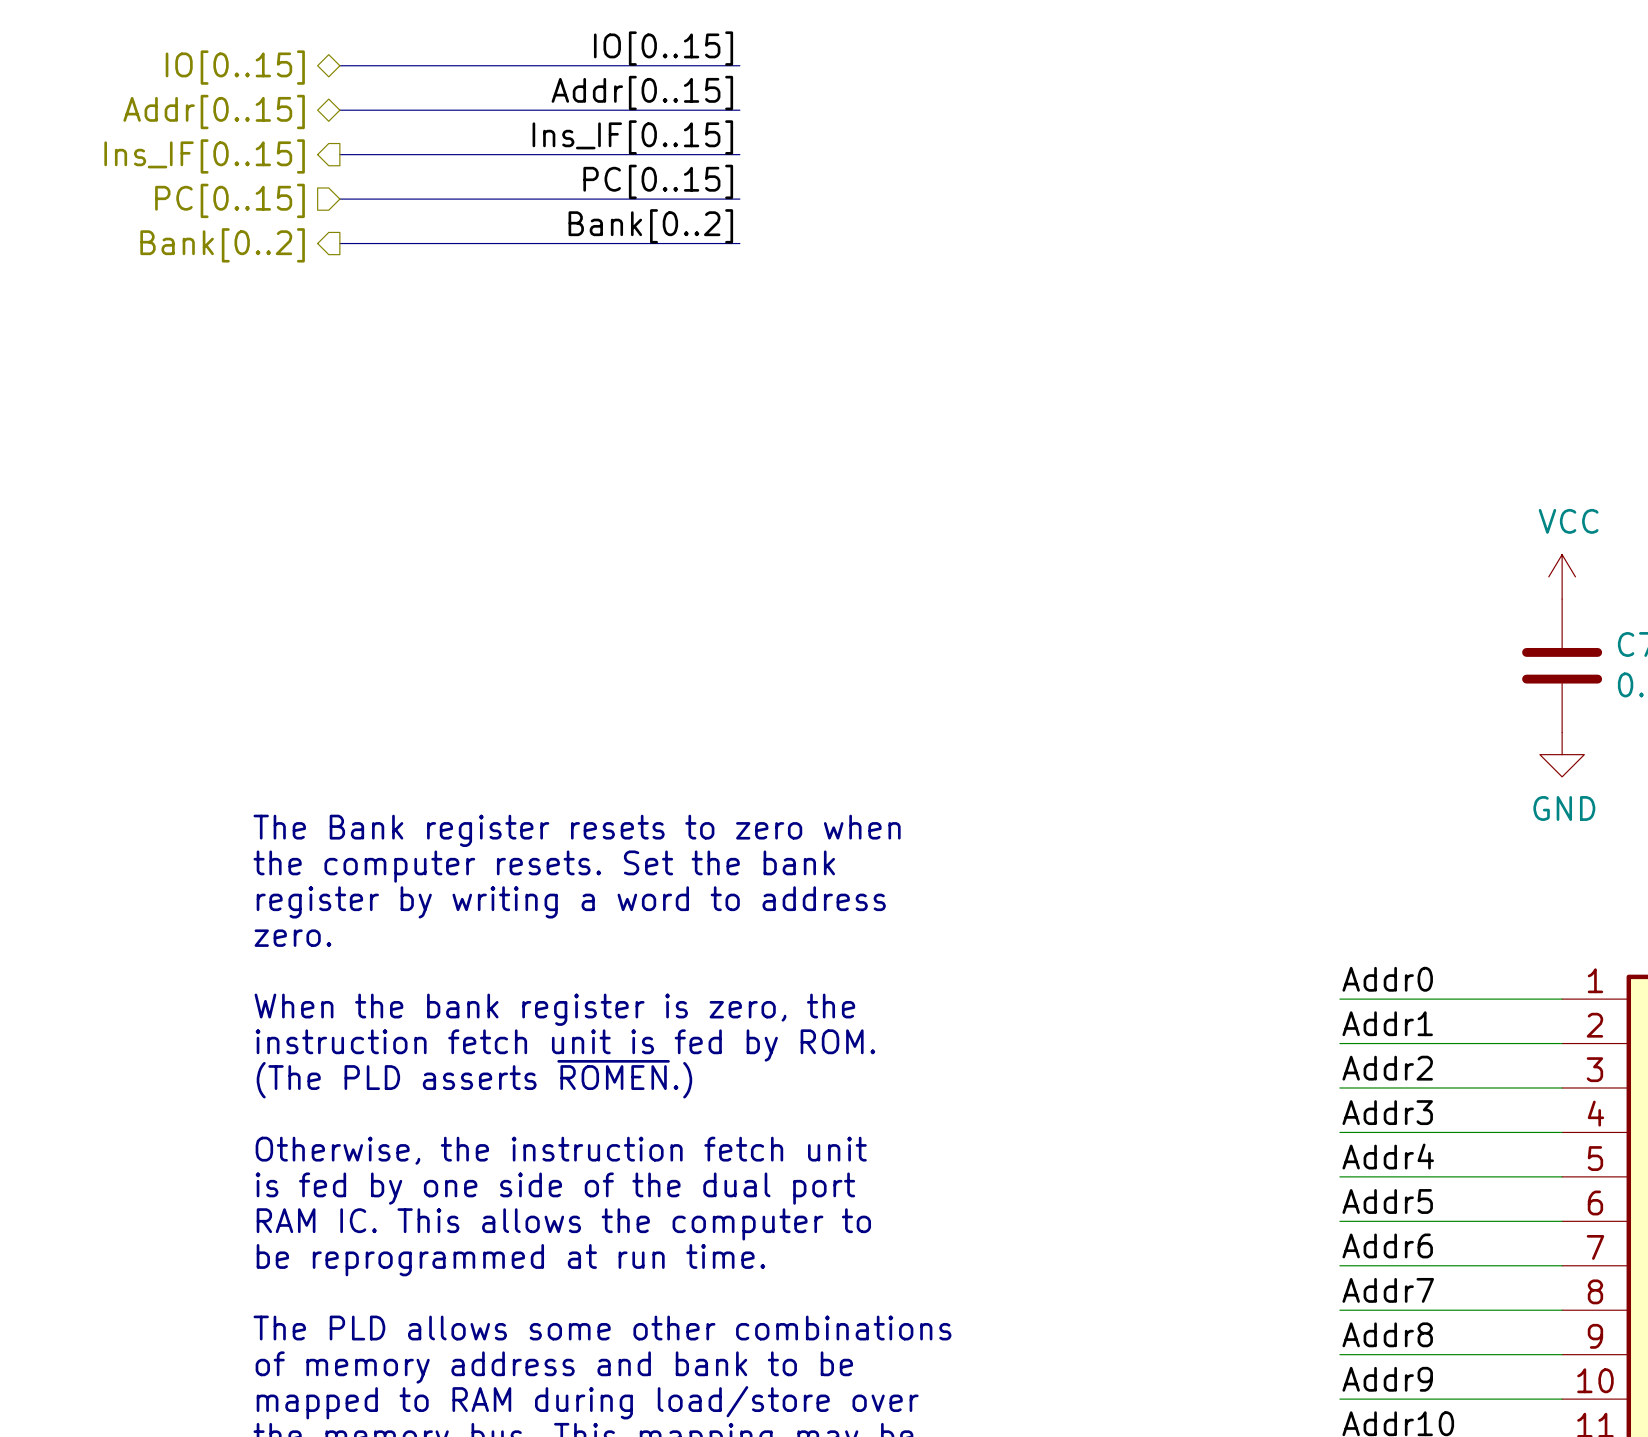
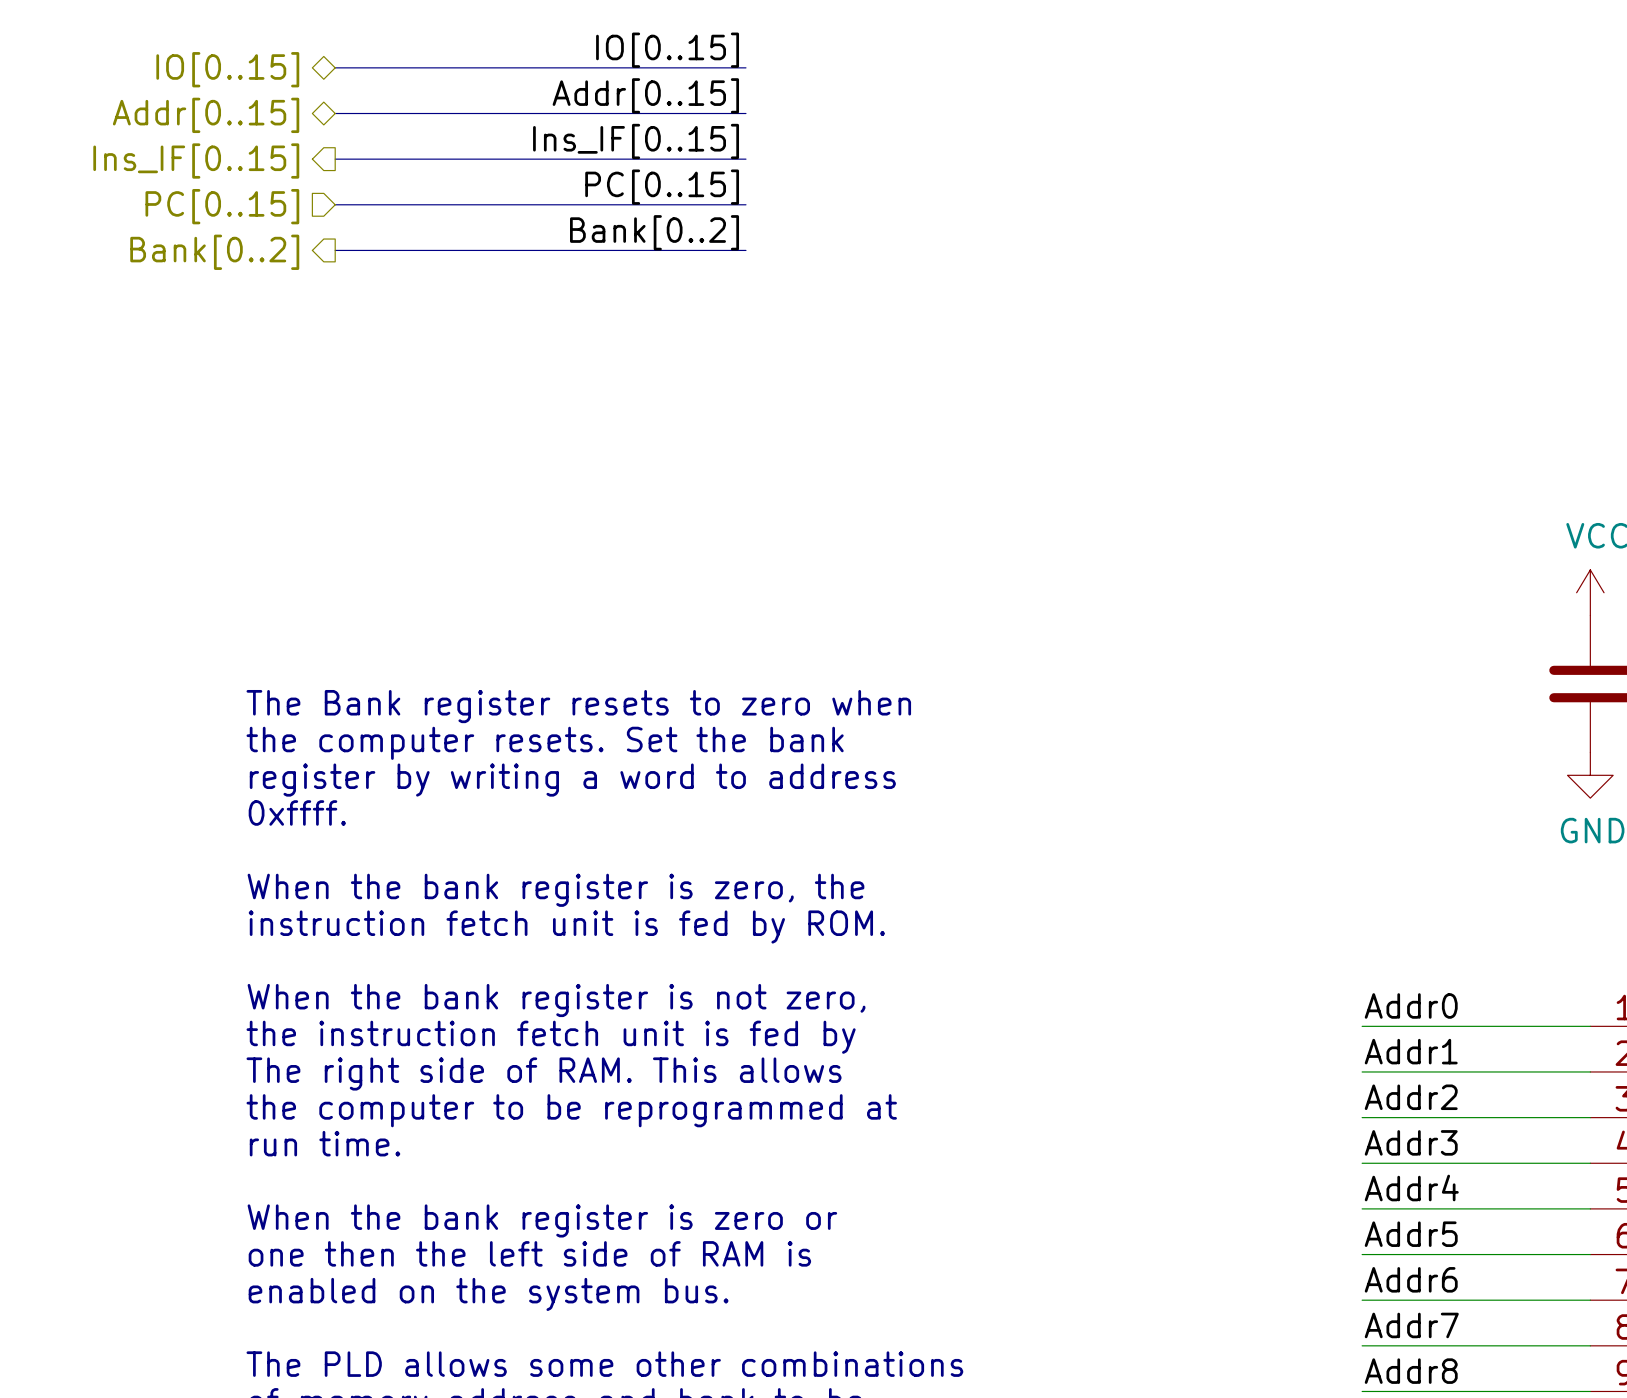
text: none -> the computer resets. Set the bank (545, 743)
text: none -> register by writing a word to address (572, 780)
text: none -> 0xffff. (297, 812)
text position: The Bank register resets to zero when (577, 830) -> The Bank register resets to zero when (578, 706)
text: the computer resets. Set the bank (544, 866) -> When the bank register is zero, the (555, 890)
text: register by writing a word to address (571, 902) -> instruction fetch unit is fed by ROM. (566, 927)
text: zero. (292, 938) -> none
text: none -> When the bank register is not zero, (556, 1000)
text: When the bank register is zero, the (554, 1009) -> the instruction fetch unit is fed by (551, 1037)
text: instruction fetch unit is fed by ROM. (565, 1045) -> The right side of RAM. This allows (544, 1073)
text: (The PLD asserts ~{ROMEN}.) (474, 1079) -> the computer to be reprogrammed at (571, 1110)
text: none -> run time. (325, 1143)
text: Otherwise, the instruction fetch unit (561, 1150) -> none
text: is fed by one side of the dual port (555, 1188) -> When the bank register is zero or (542, 1220)
text: RAM IC. This allows the computer to (563, 1224) -> one then the left side of RAM is (529, 1253)
text: be reprogrammed at run time. (510, 1260) -> enabled on the system bus. (488, 1294)

